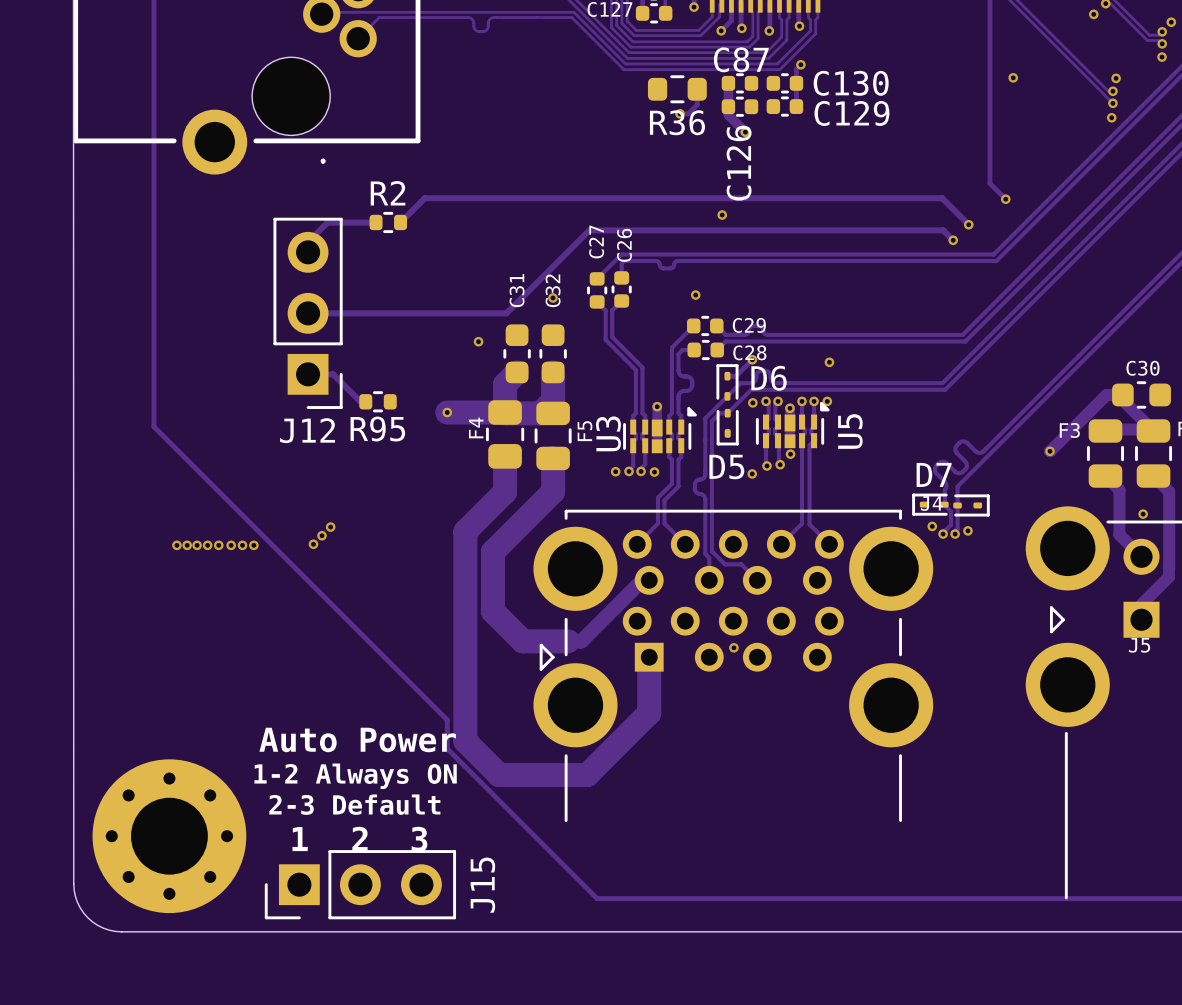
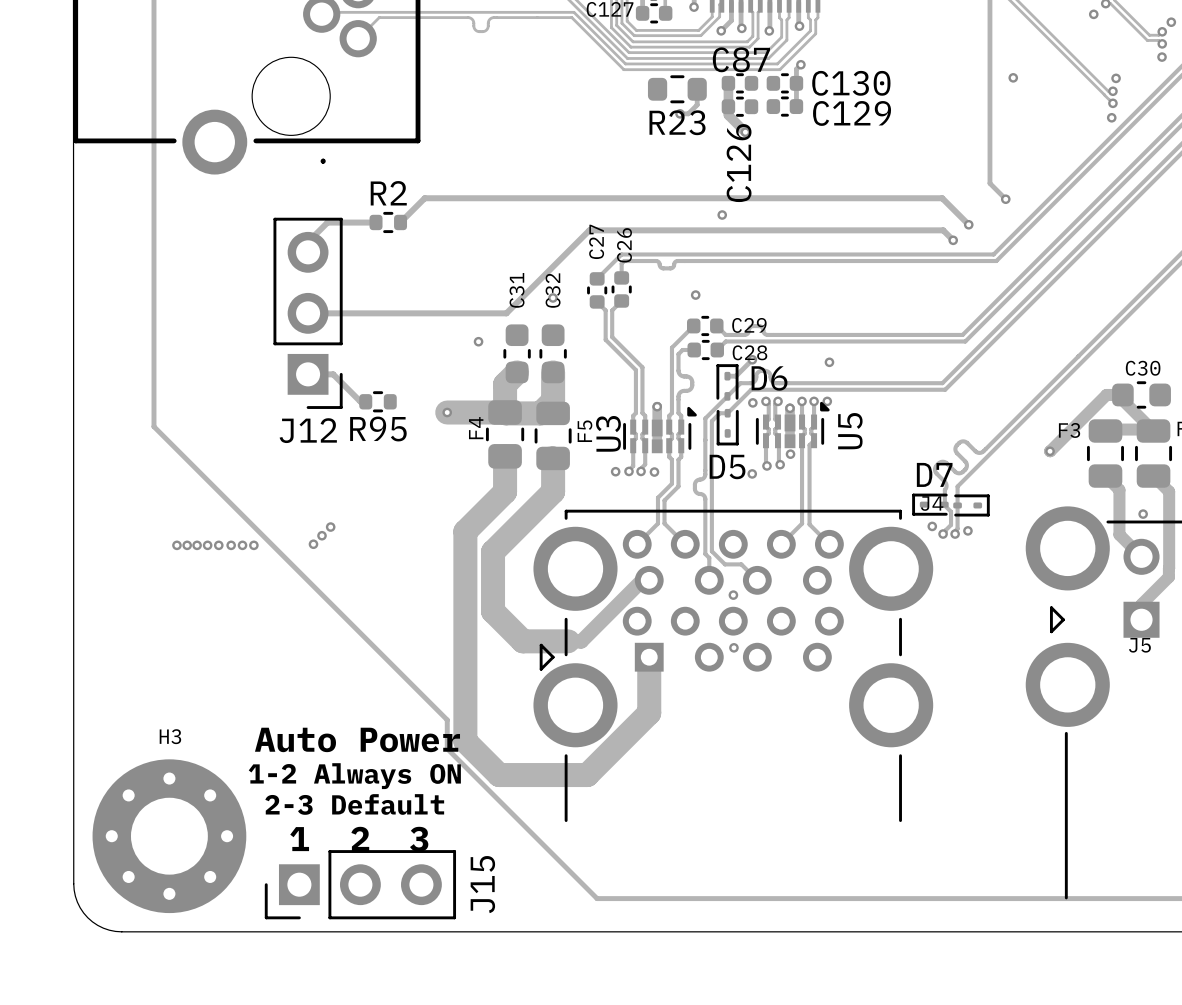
R36 name: R36 (677, 122) -> R23 (677, 122)
via: none -> (733, 595)
H3 name: none -> H3 (170, 736)

